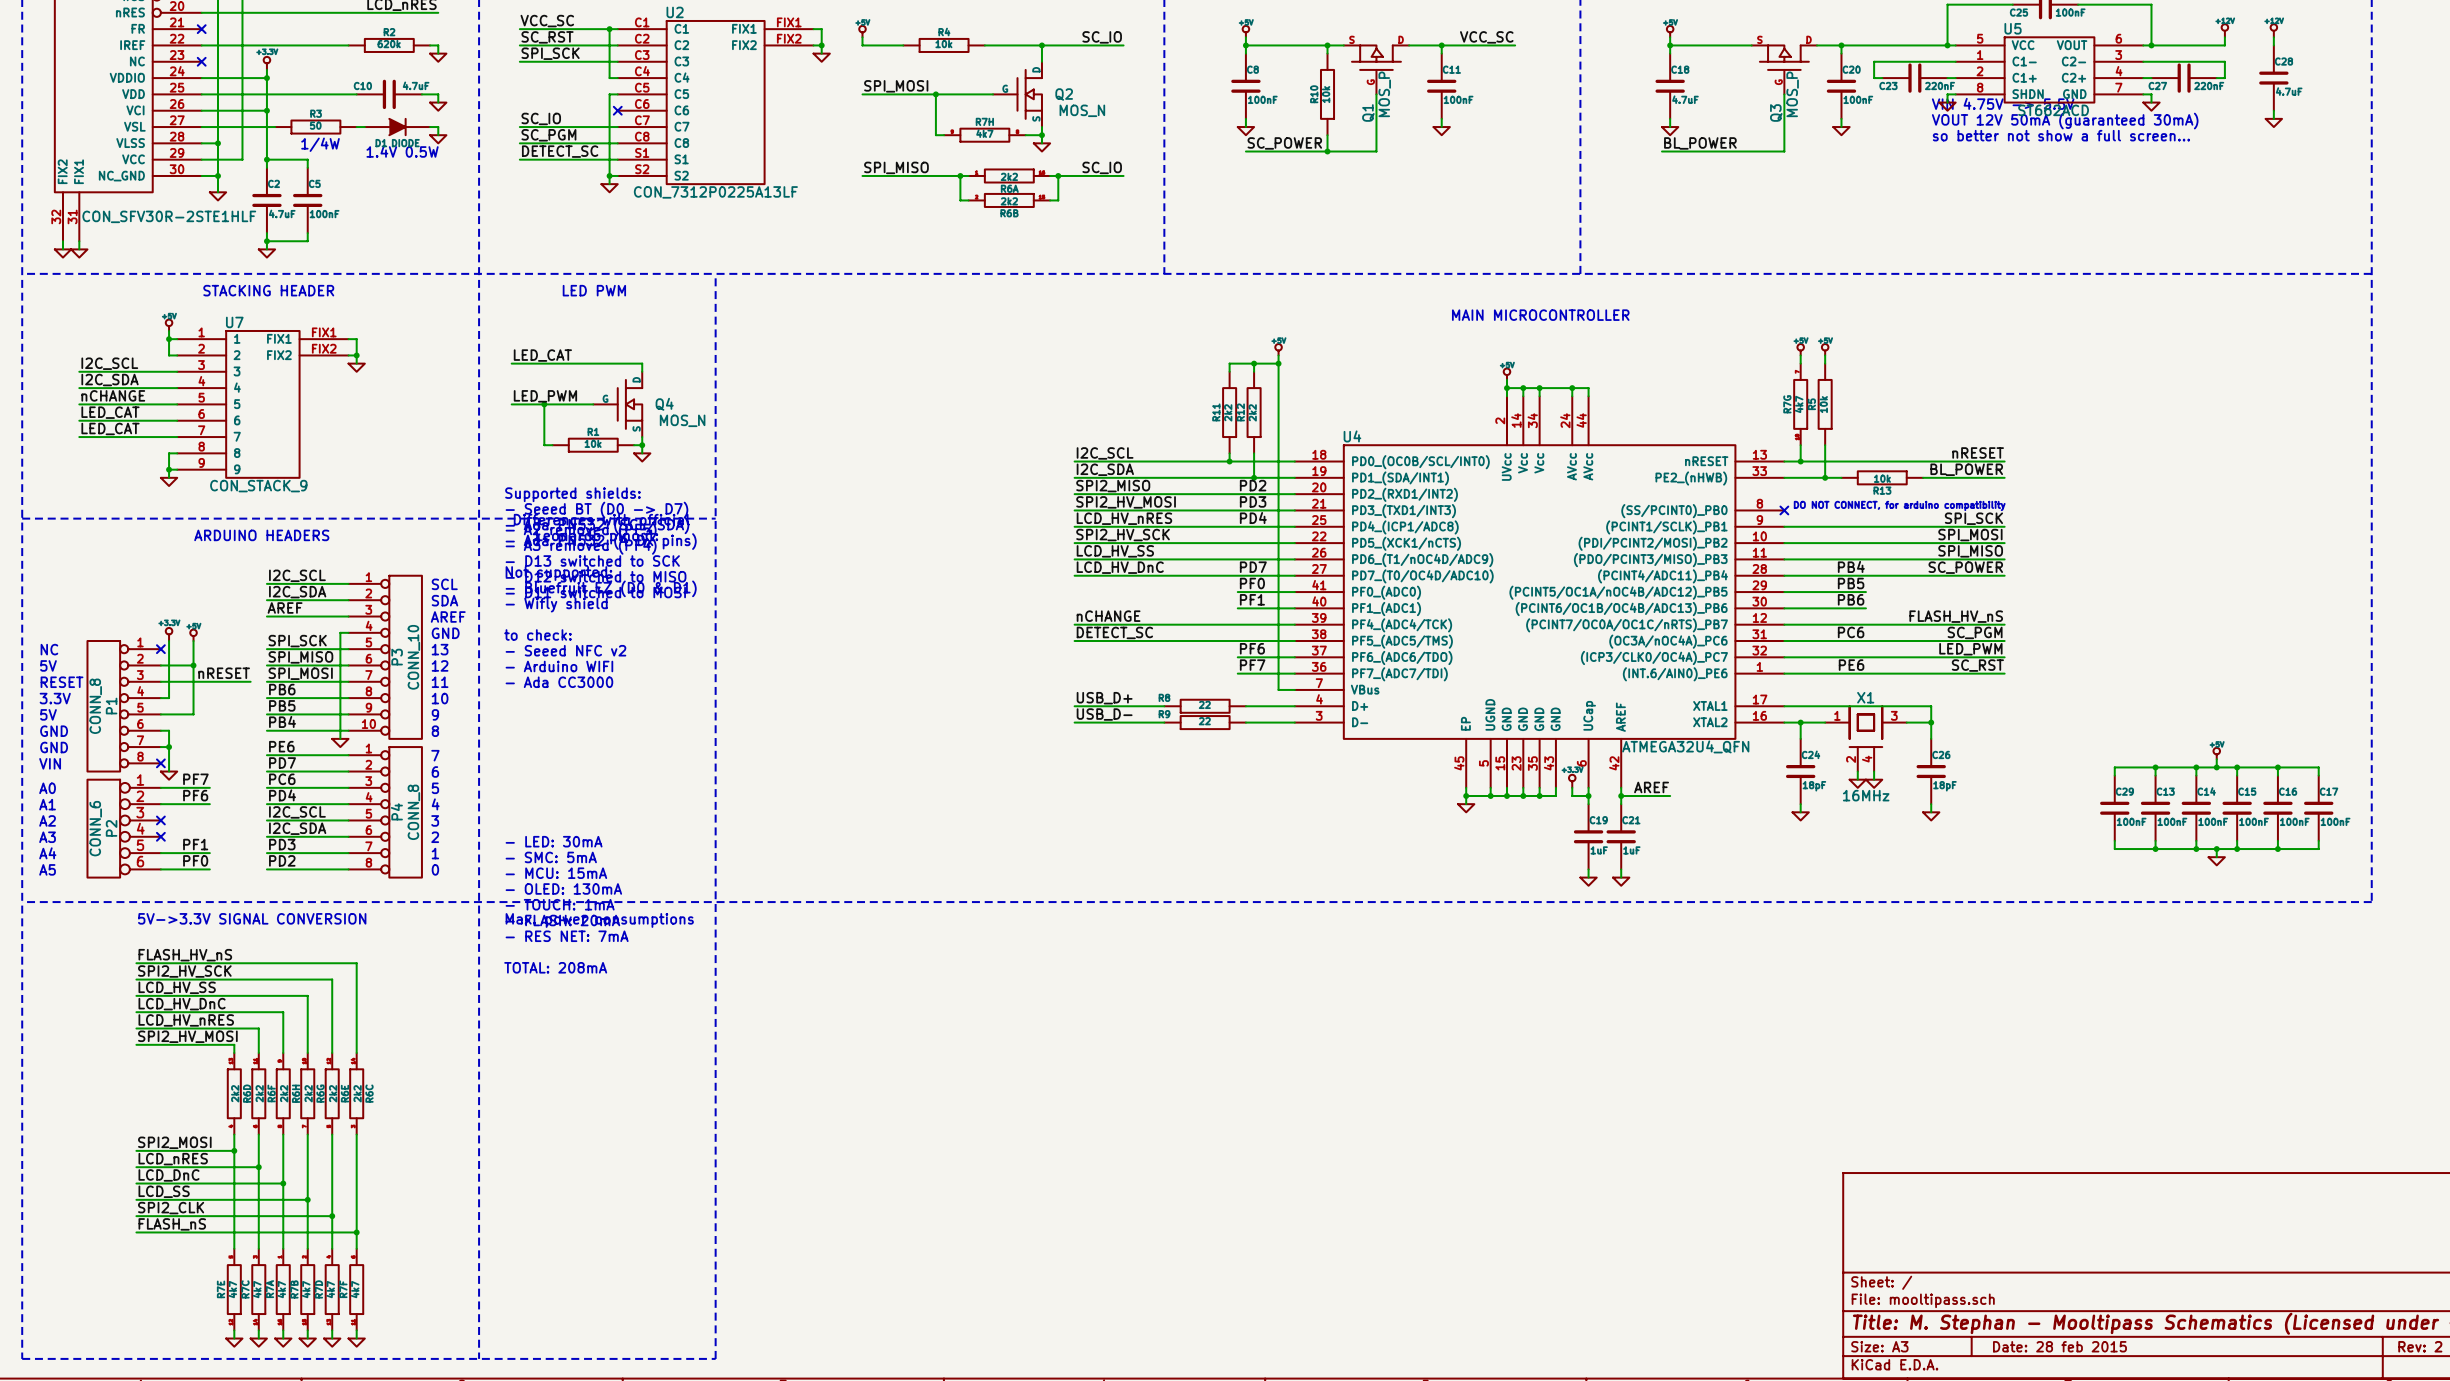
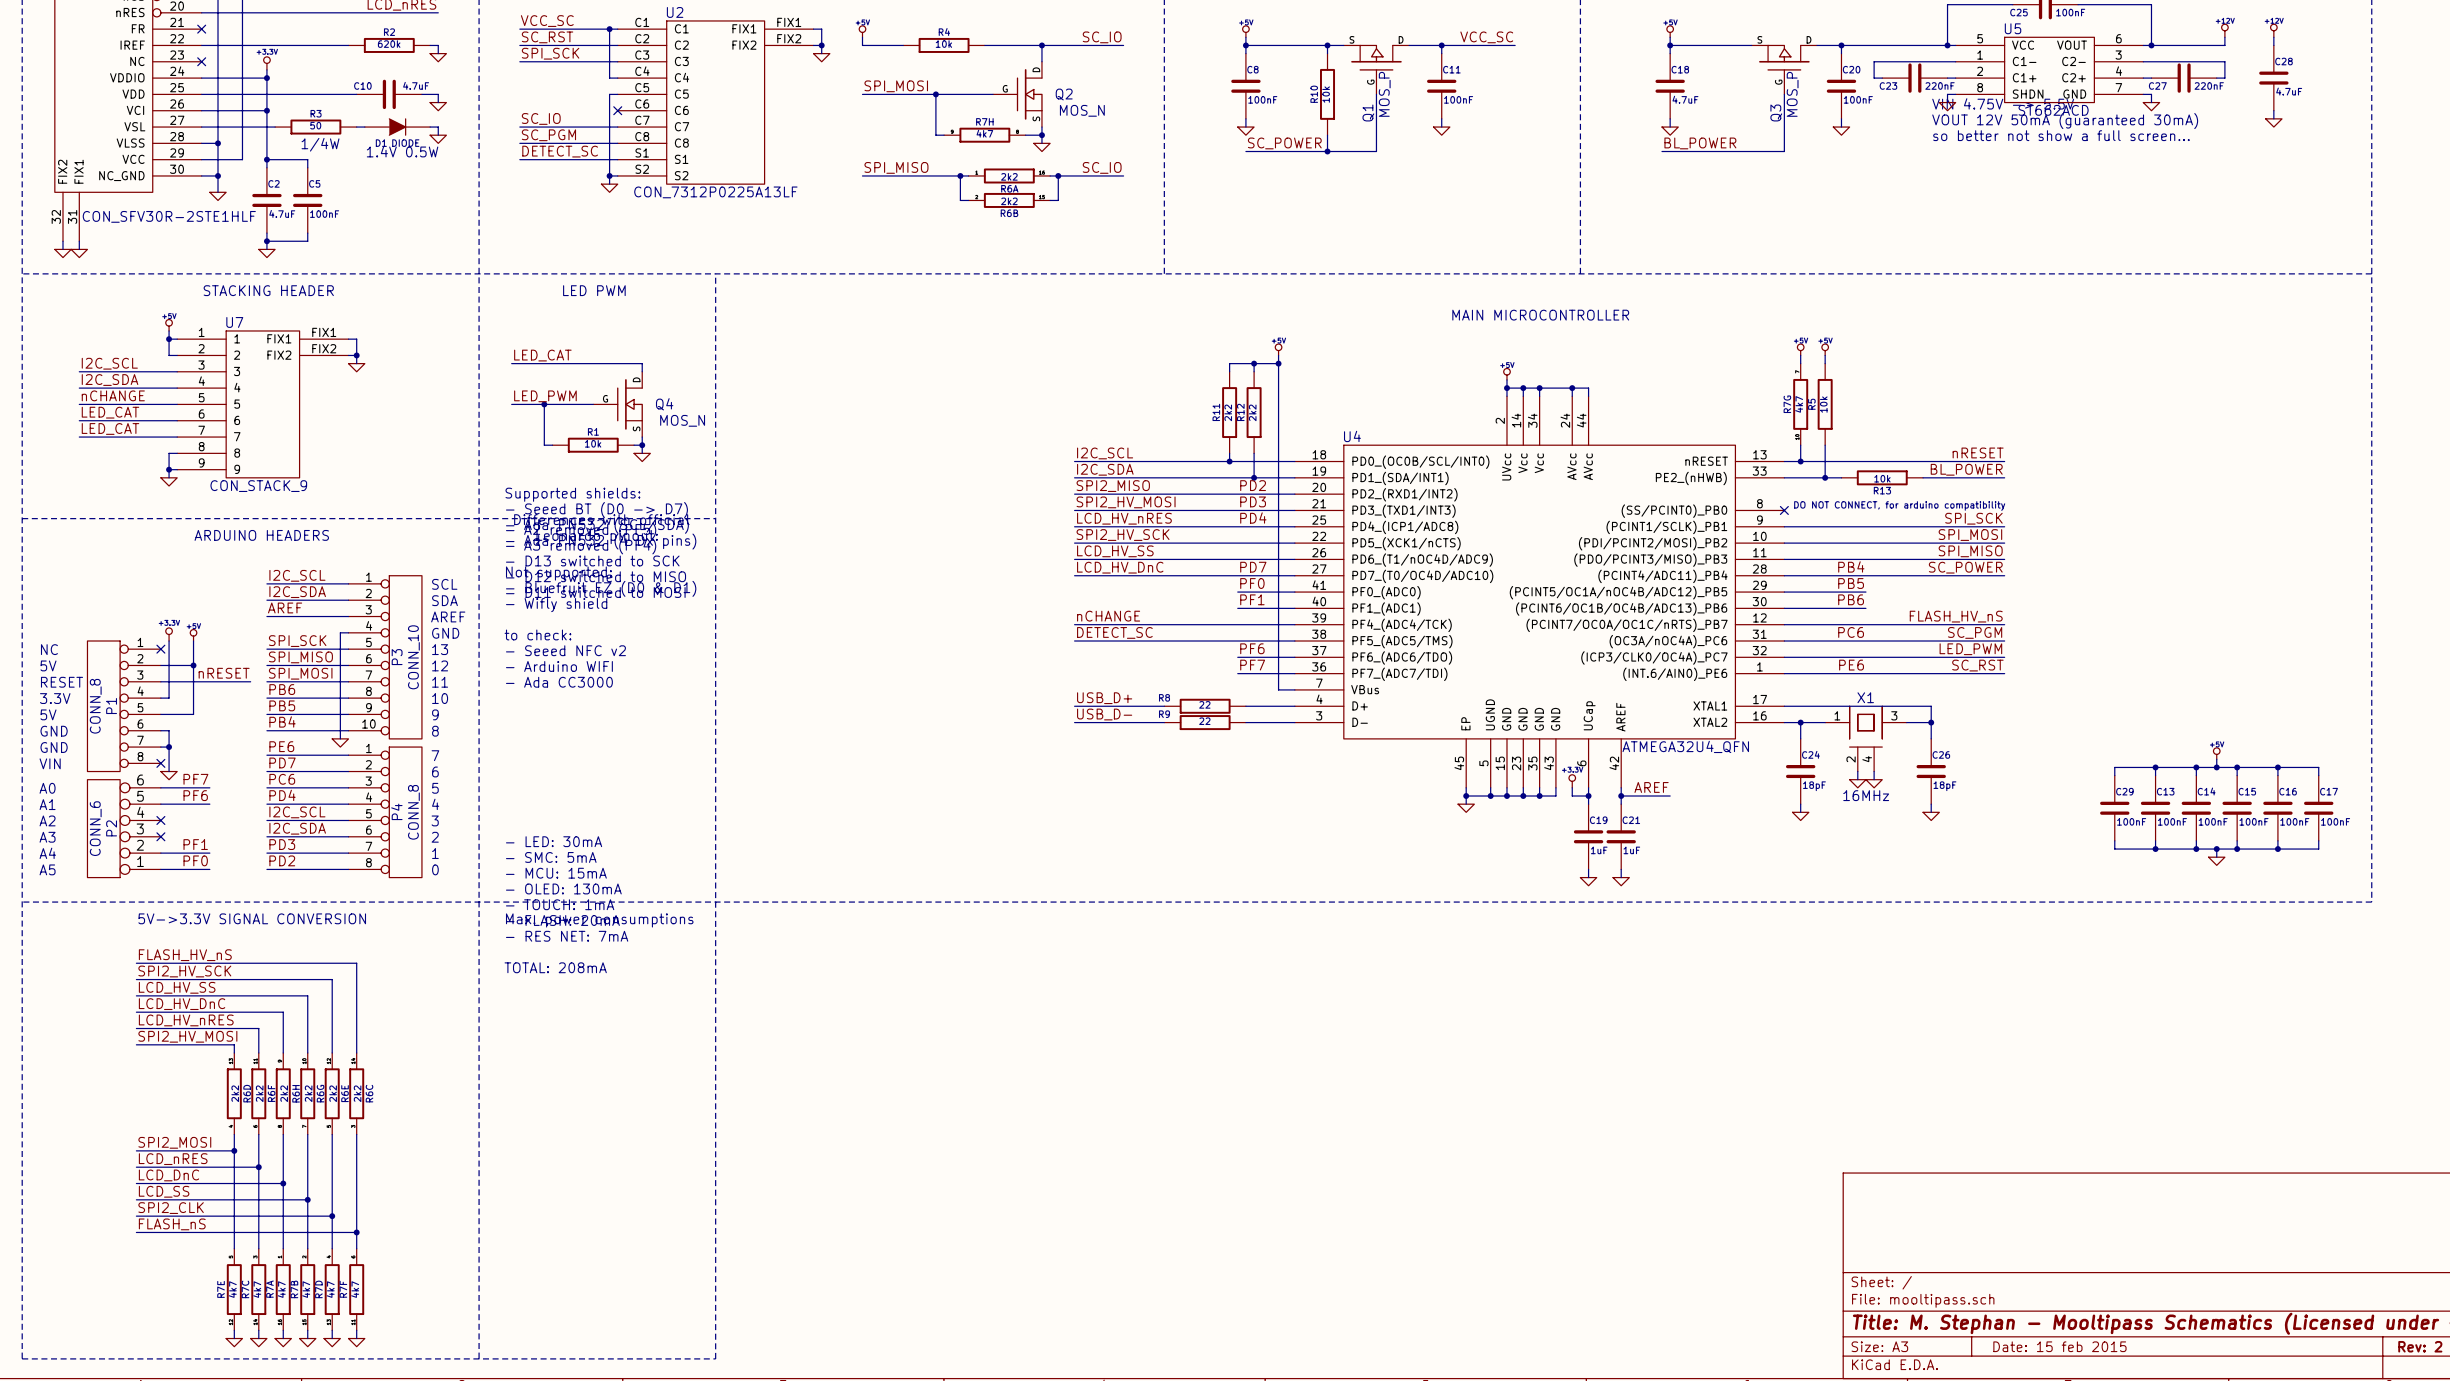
P2 flip: as is (103, 828) -> up-down (103, 828)
title block: Date: 28 feb 2015 (2059, 1346) -> Date: 15 feb 2015 (2059, 1346)

